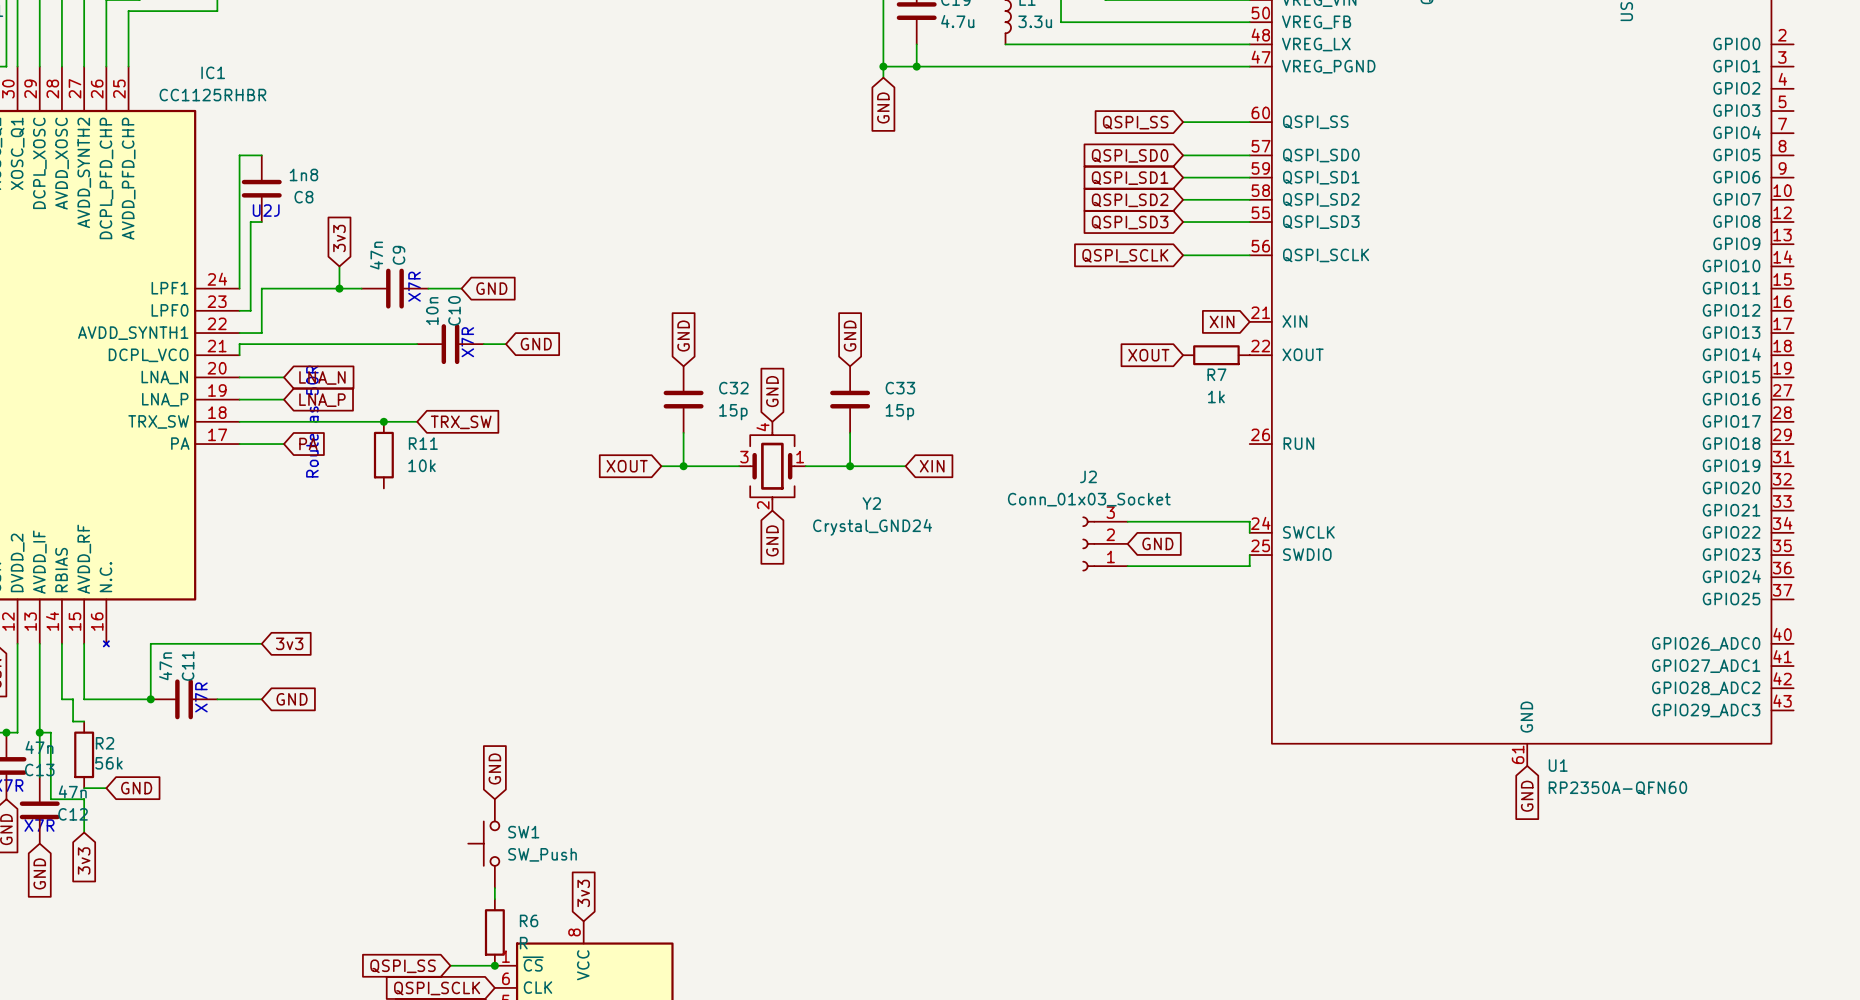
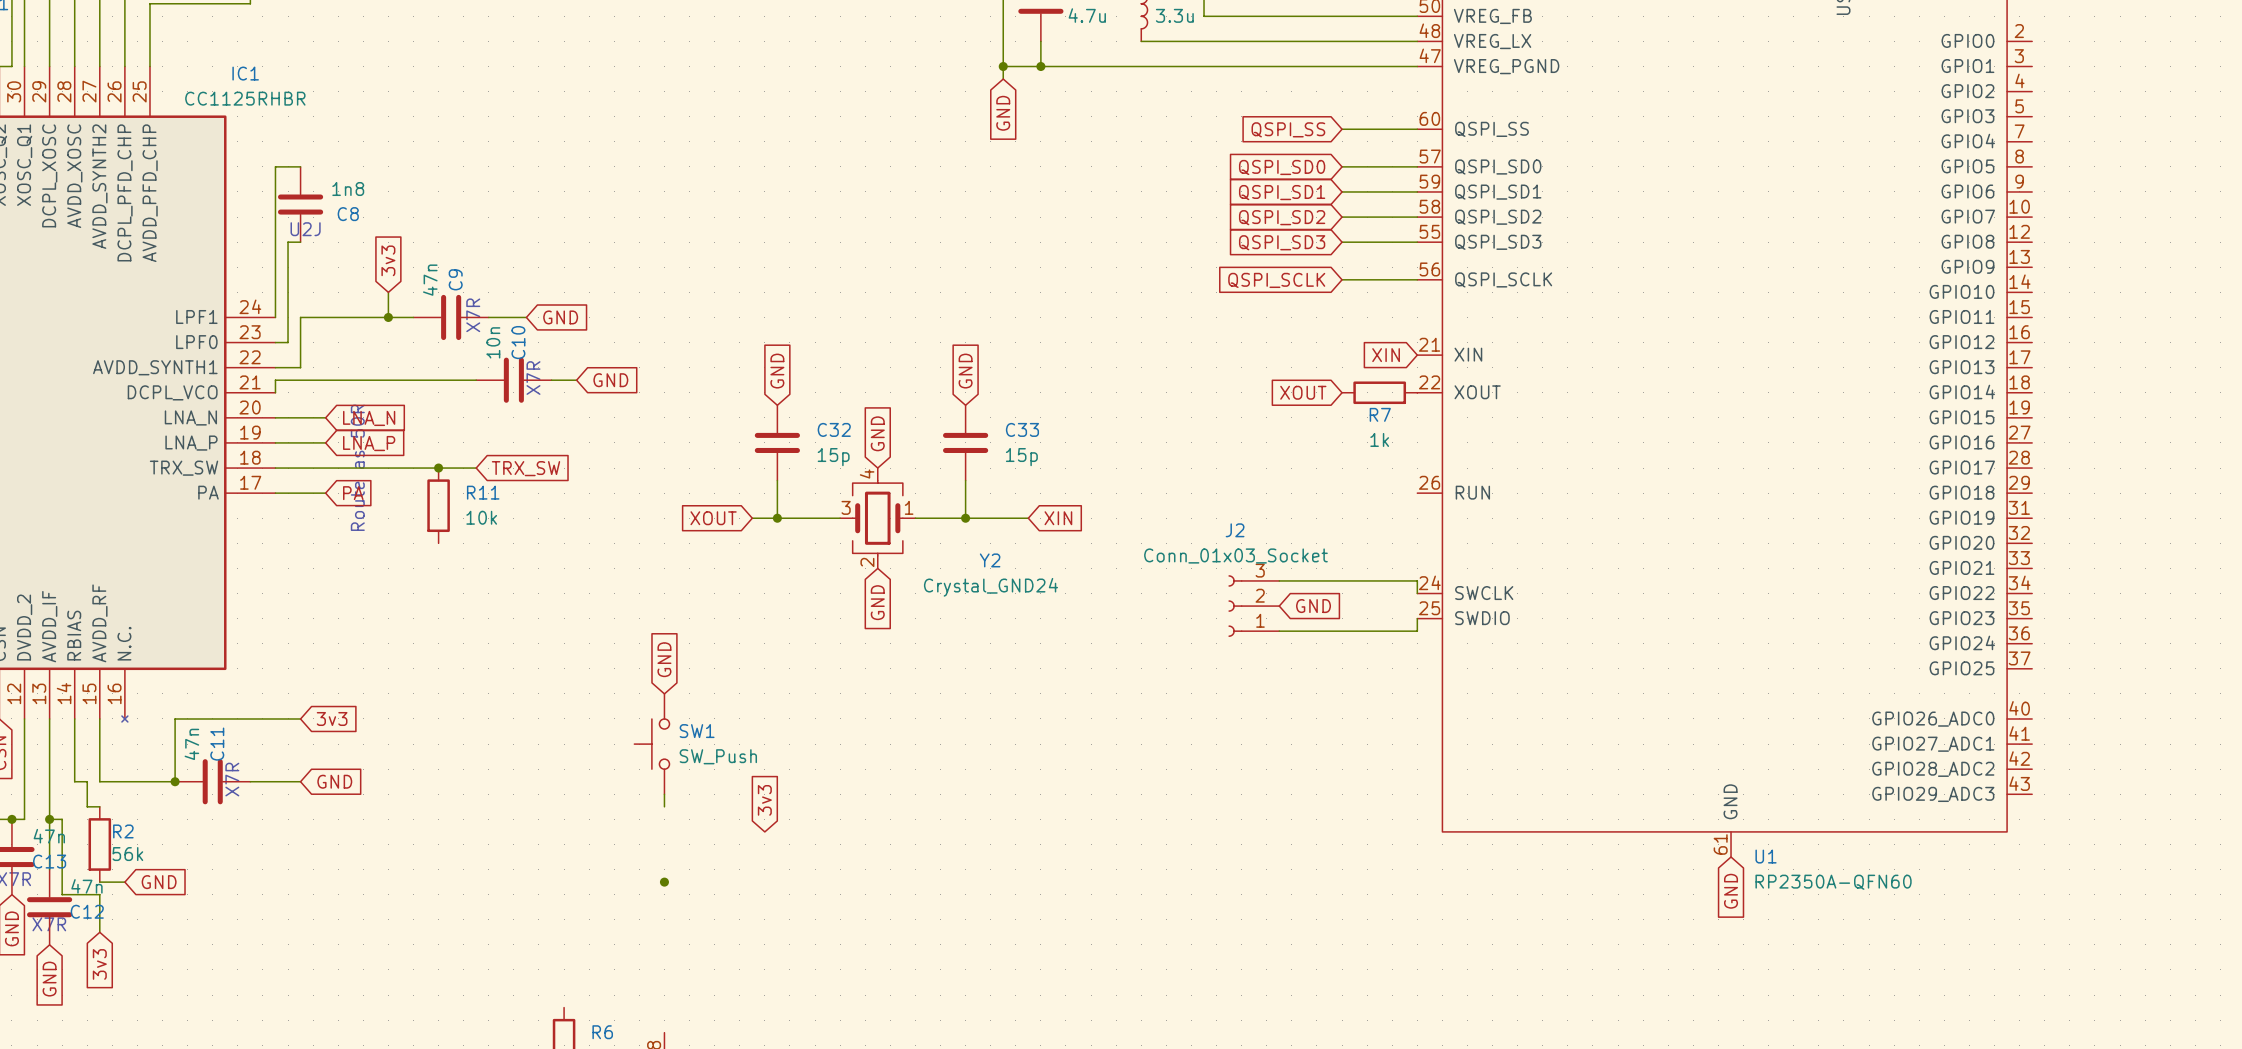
global label position: GND (494, 768) -> GND (664, 659)
junction: none -> (664, 882)
SW1 position: (483, 843) -> (651, 744)
wire: (494, 888) (494, 899) -> (664, 794) (664, 806)
global label position: 3v3 (583, 893) -> 3v3 (764, 800)

